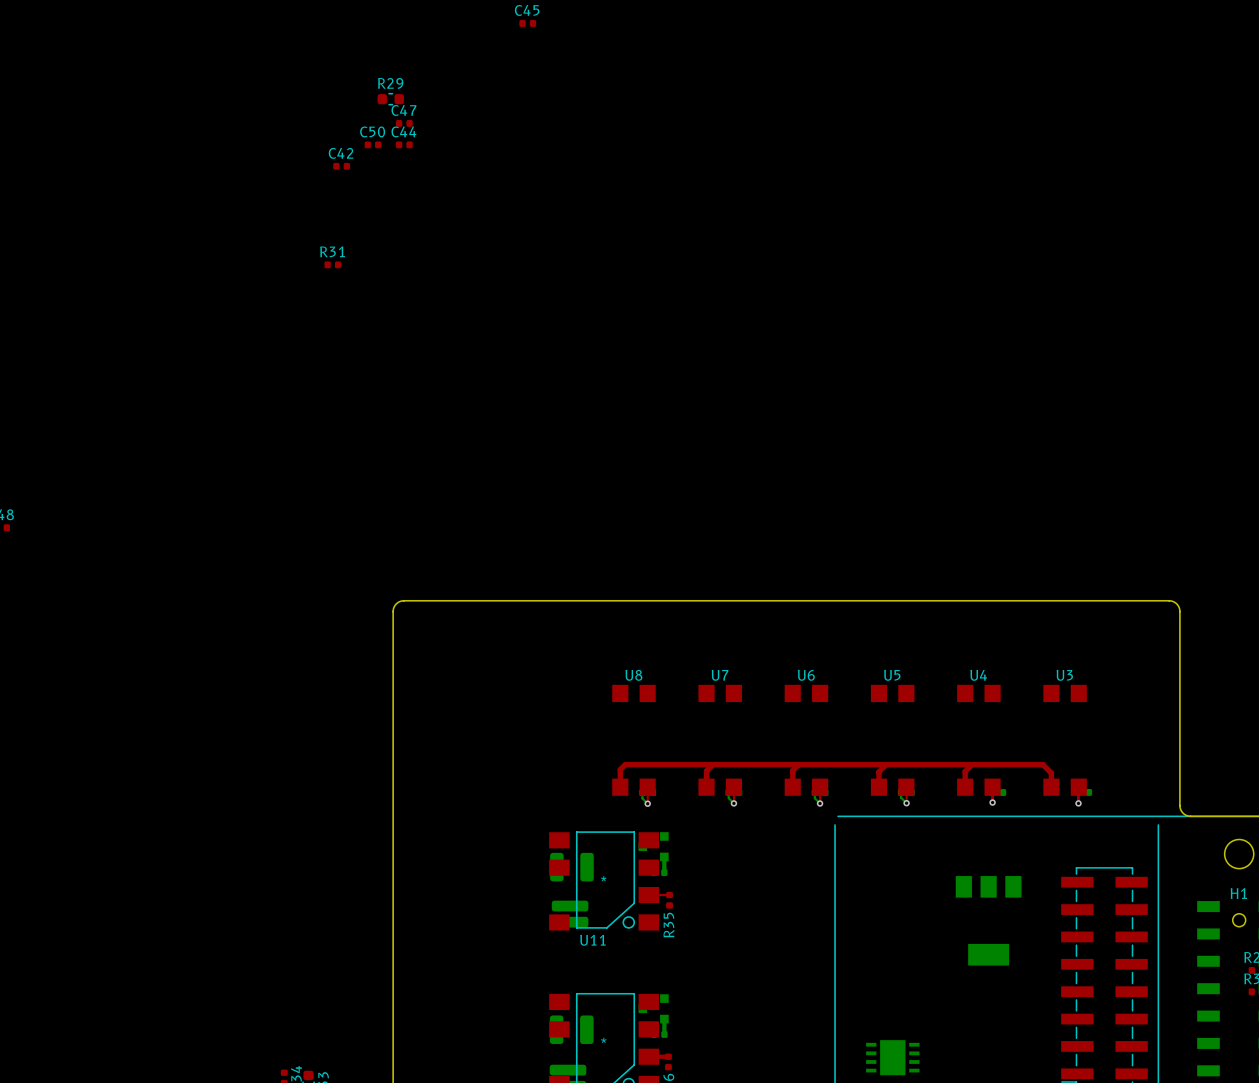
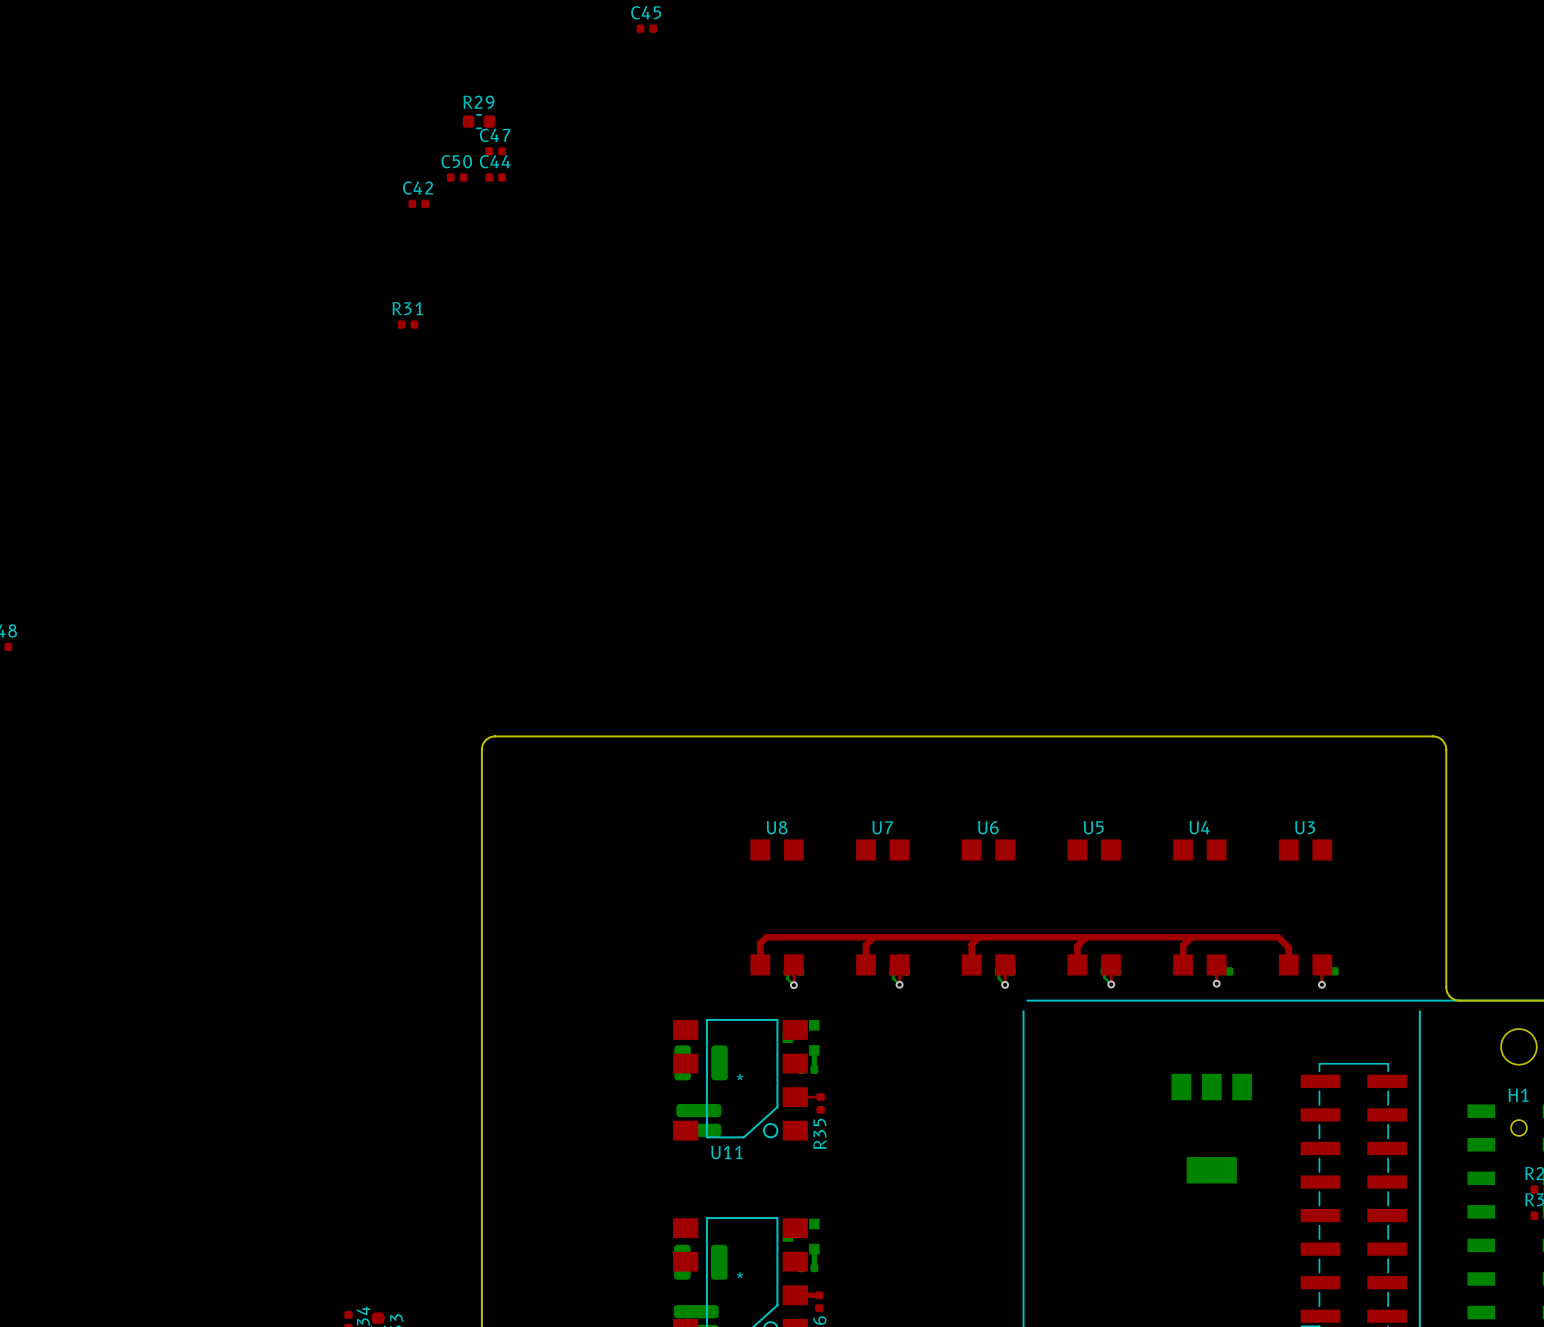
part: (892, 1057) -> none

